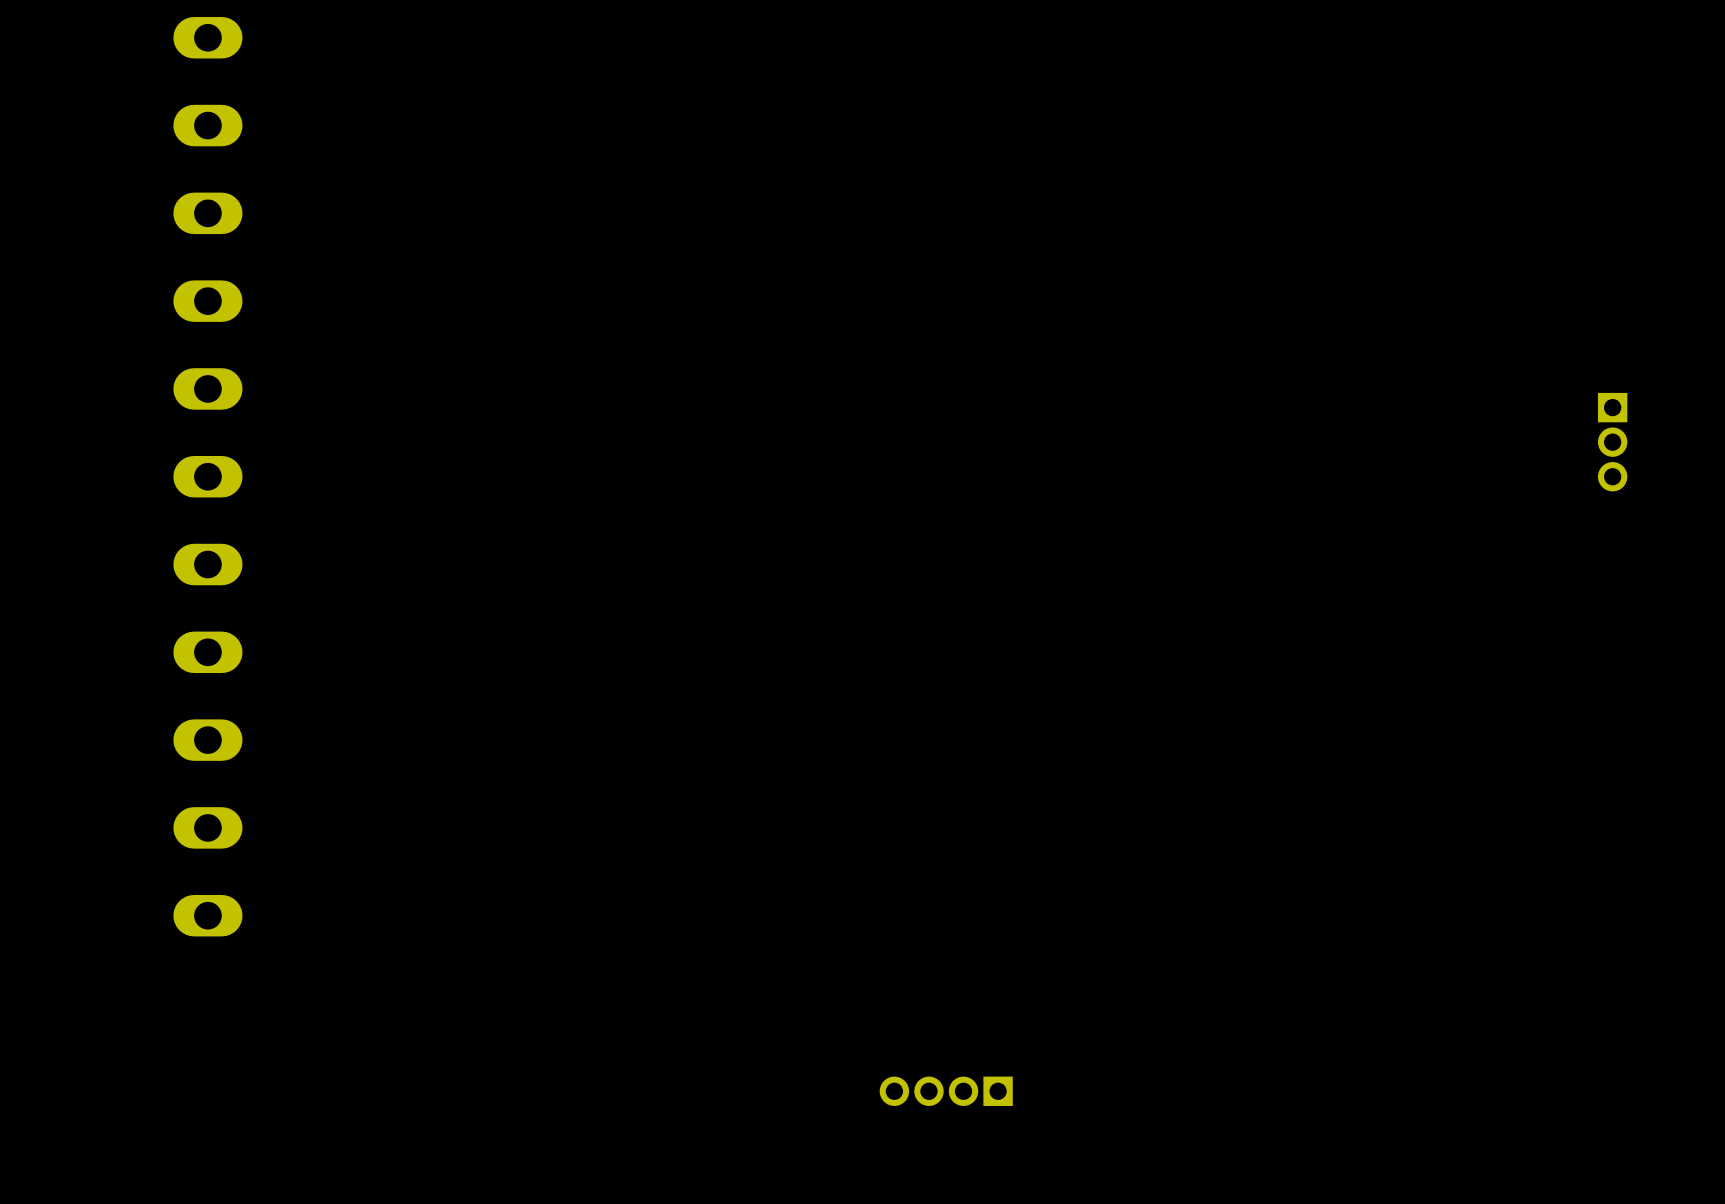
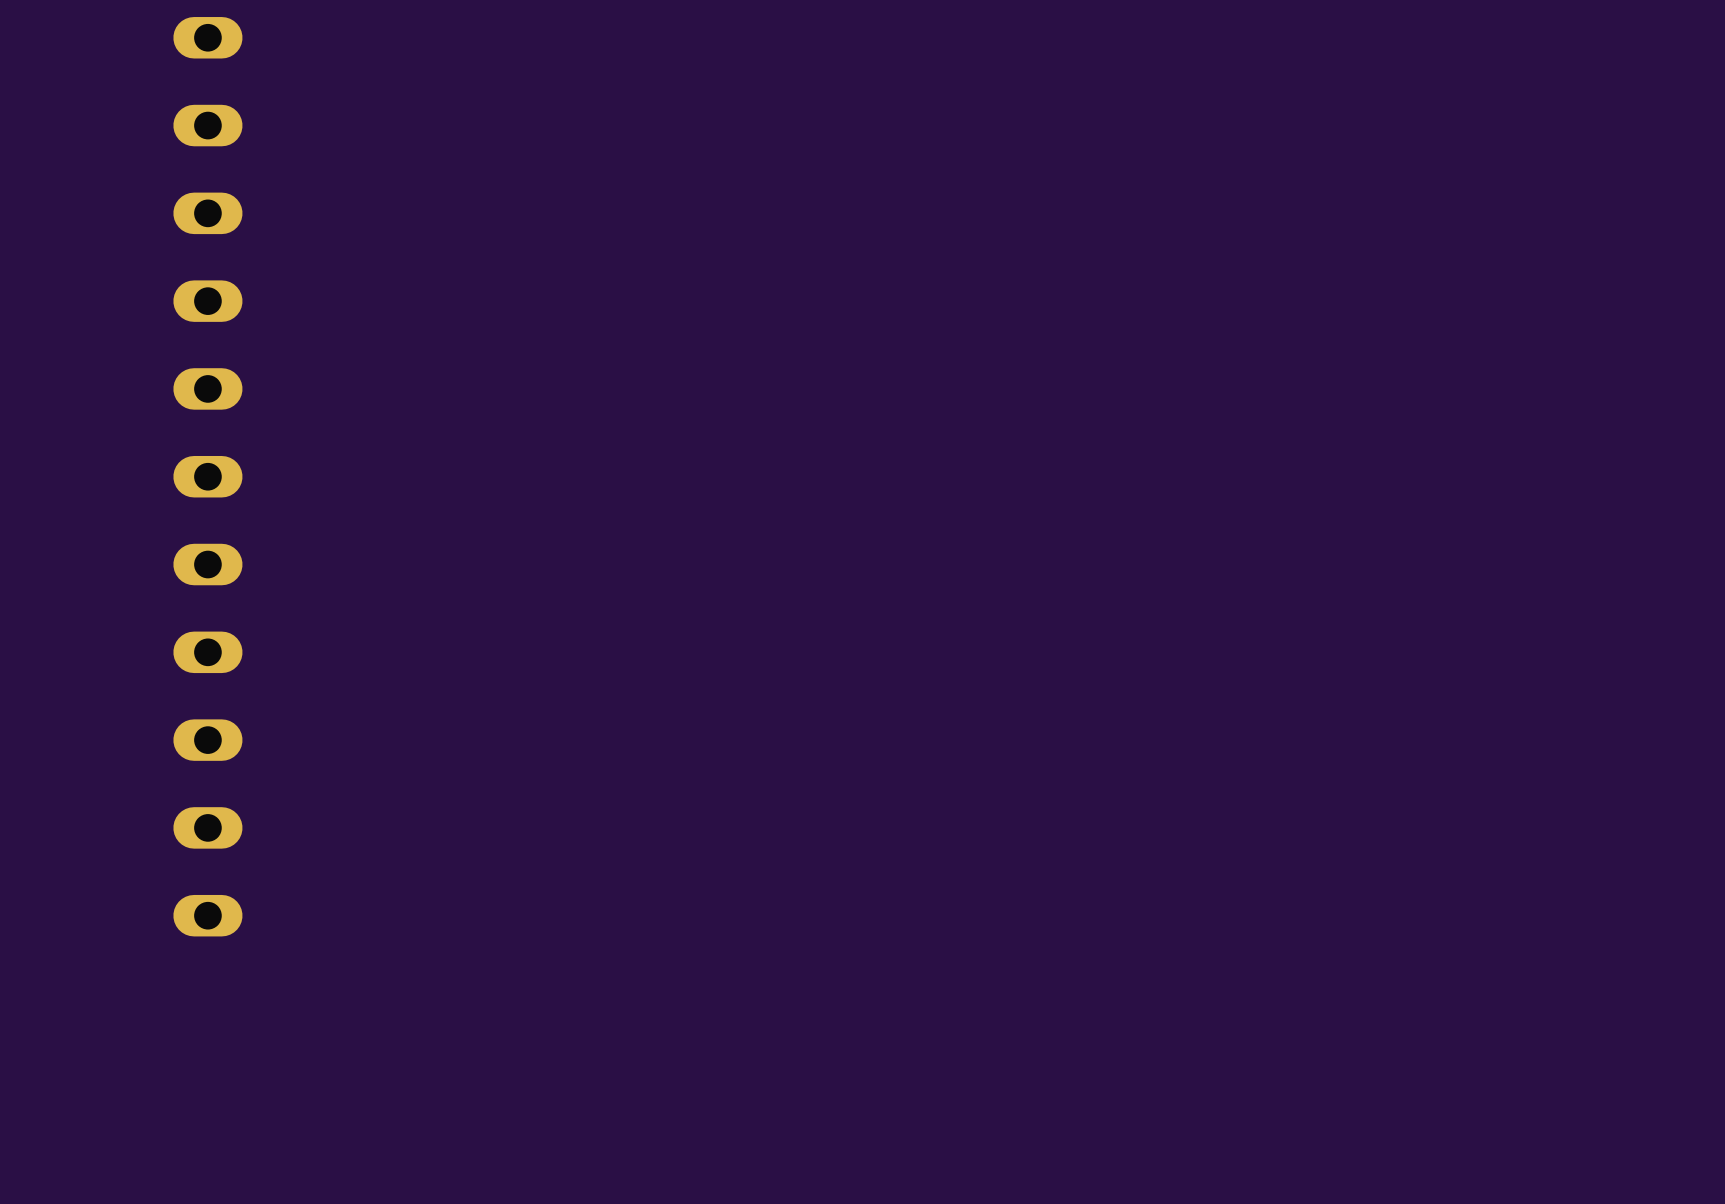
part: (1612, 442) -> none
part: (946, 1091) -> none

